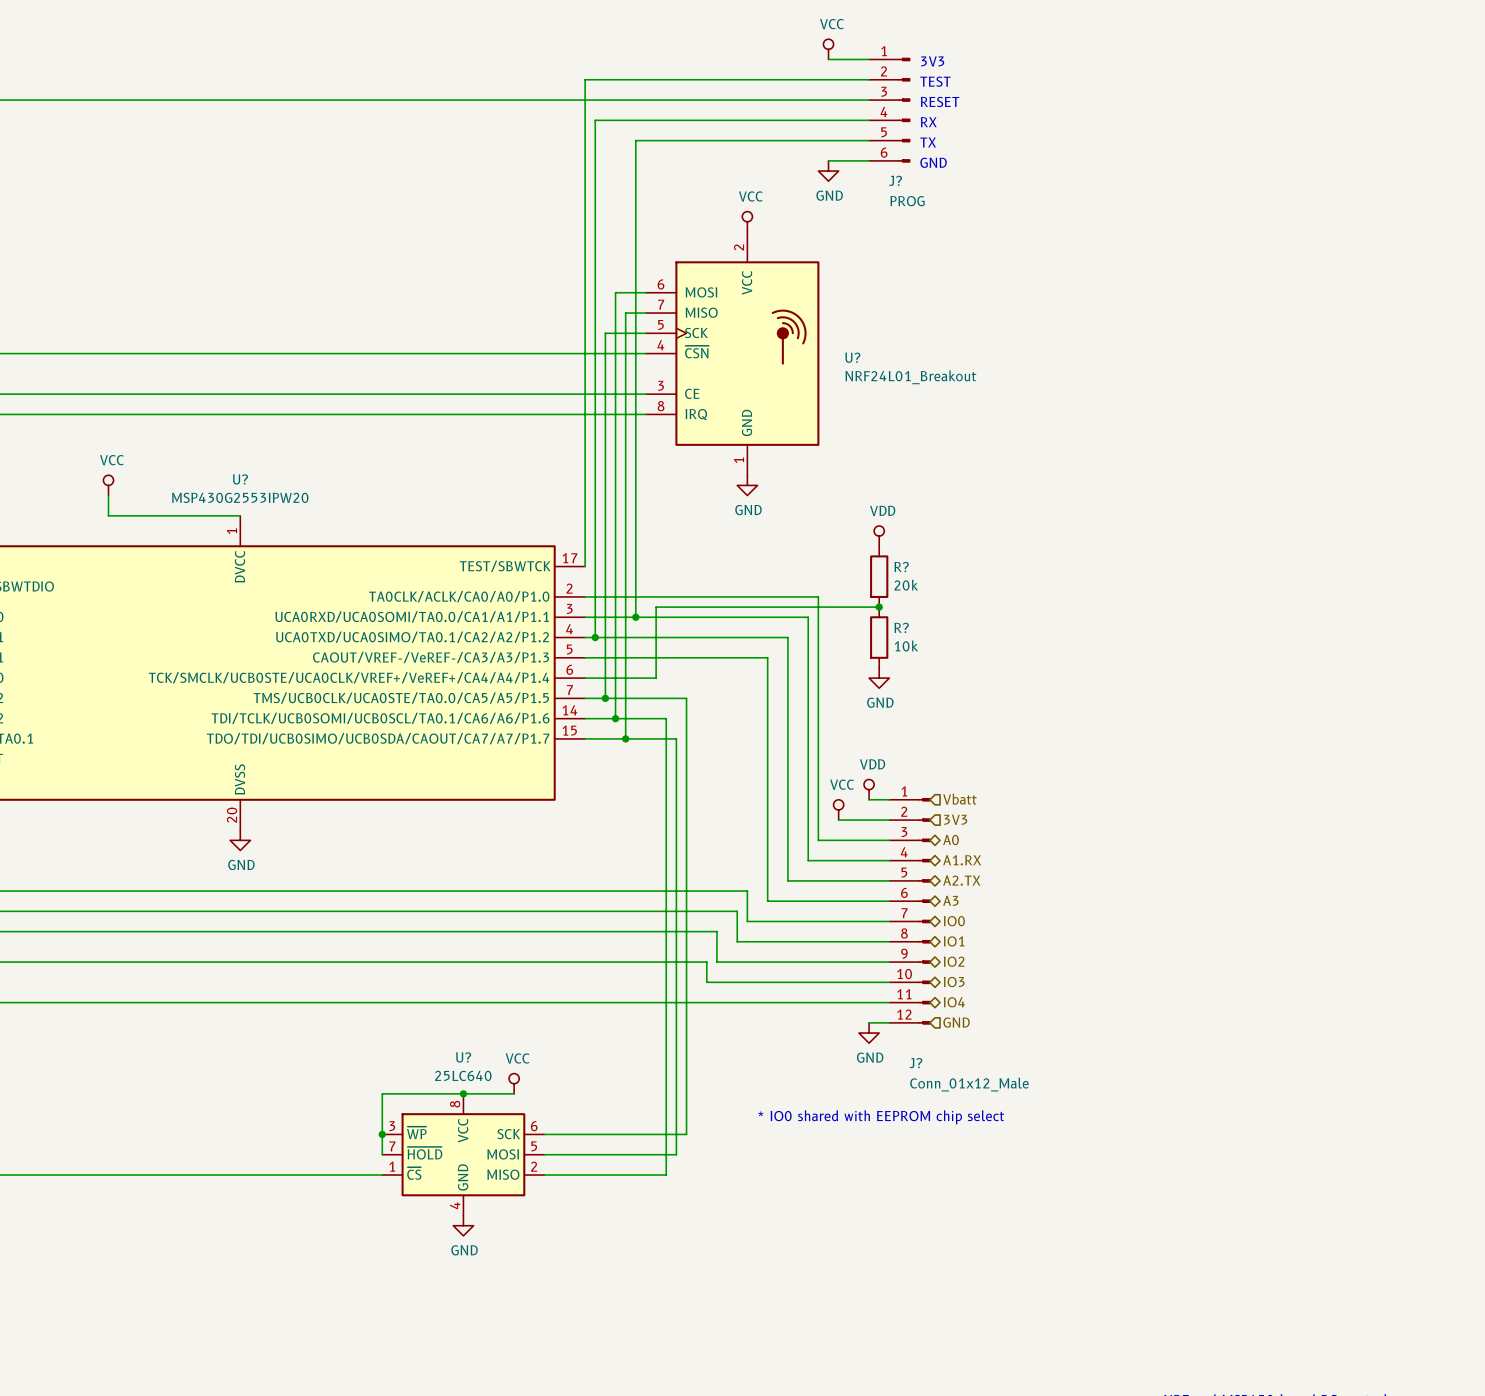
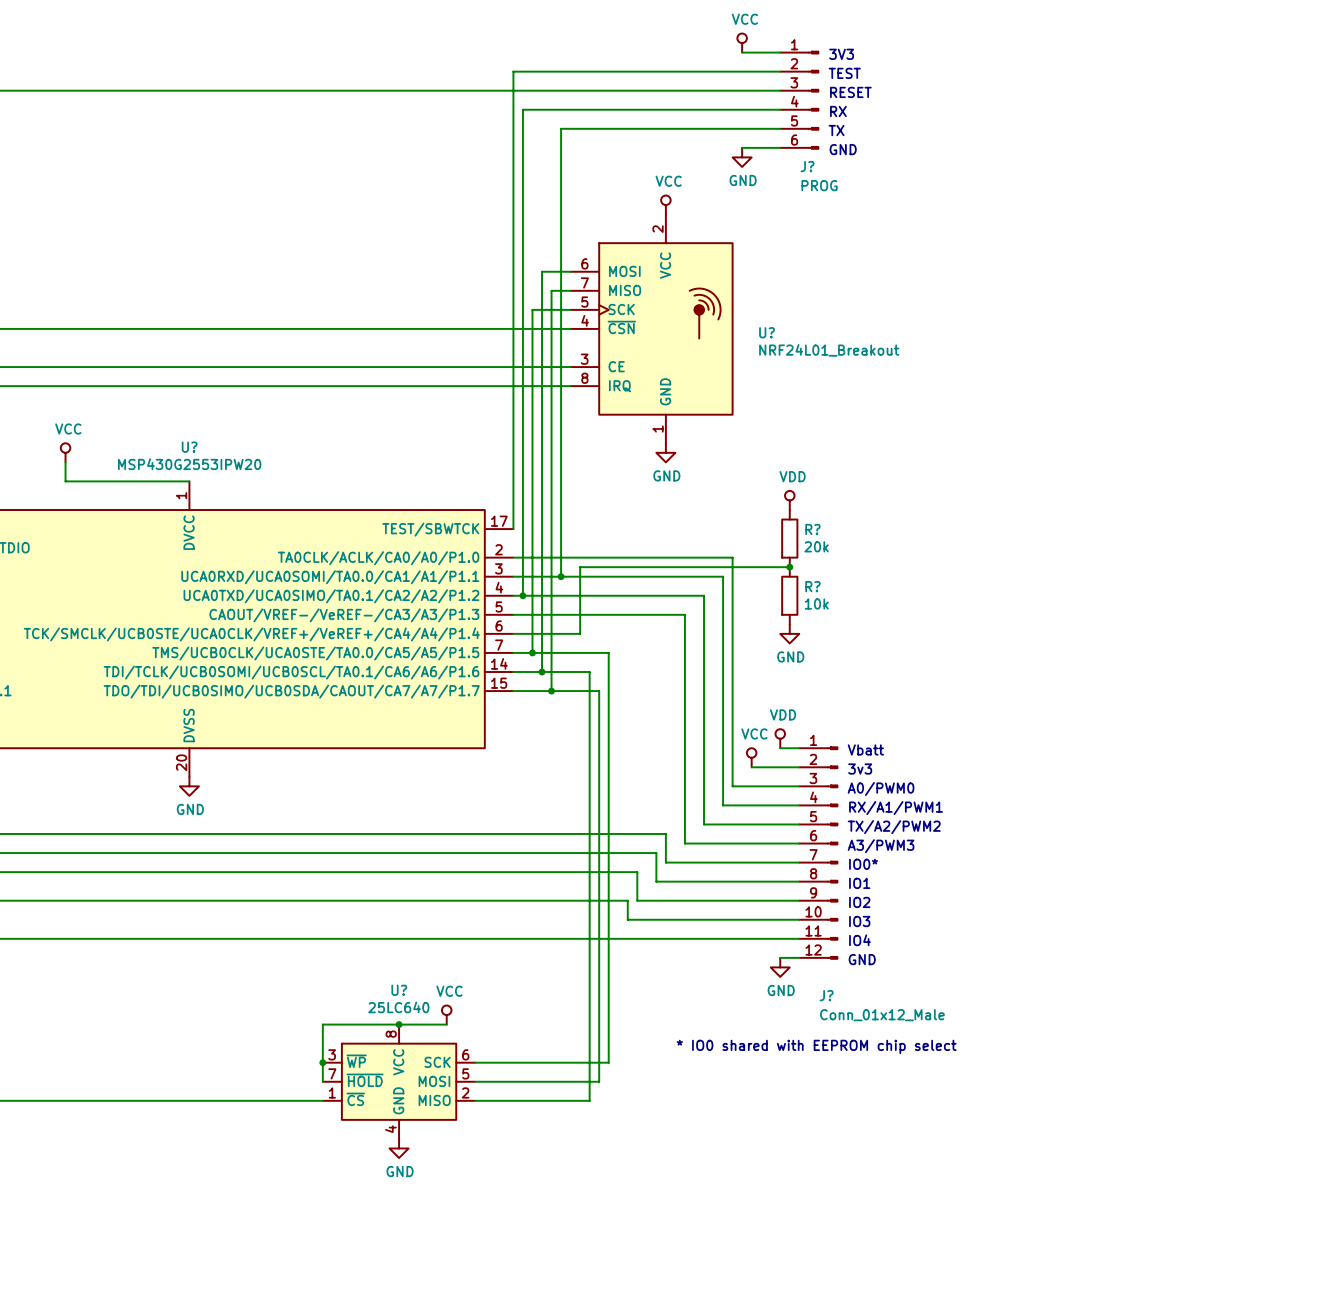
hierarchical label: Vbatt (959, 799) -> none
text: none -> Vbatt (865, 749)
hierarchical label: 3V3 (955, 819) -> none
text: none -> 3v3 (860, 769)
hierarchical label: A0 (951, 840) -> none
text: none -> A0/PWM0 (881, 788)
hierarchical label: A1.RX (962, 860) -> none
text: none -> RX/A1/PWM1 (896, 808)
hierarchical label: A2.TX (961, 880) -> none
text: none -> TX/A2/PWM2 (894, 827)
hierarchical label: A3 (950, 900) -> none
text: none -> A3/PWM3 (881, 846)
hierarchical label: IO0 (954, 921) -> none
text: none -> IO0* (863, 864)
hierarchical label: IO1 (954, 941) -> none
text: none -> IO1 (859, 883)
hierarchical label: IO2 (954, 961) -> none
text: none -> IO2 (859, 902)
hierarchical label: IO3 (954, 982) -> none
text: none -> IO3 (859, 921)
hierarchical label: IO4 (954, 1002) -> none
text: none -> IO4 (859, 940)
hierarchical label: GND (956, 1022) -> none
text: none -> GND (862, 959)

